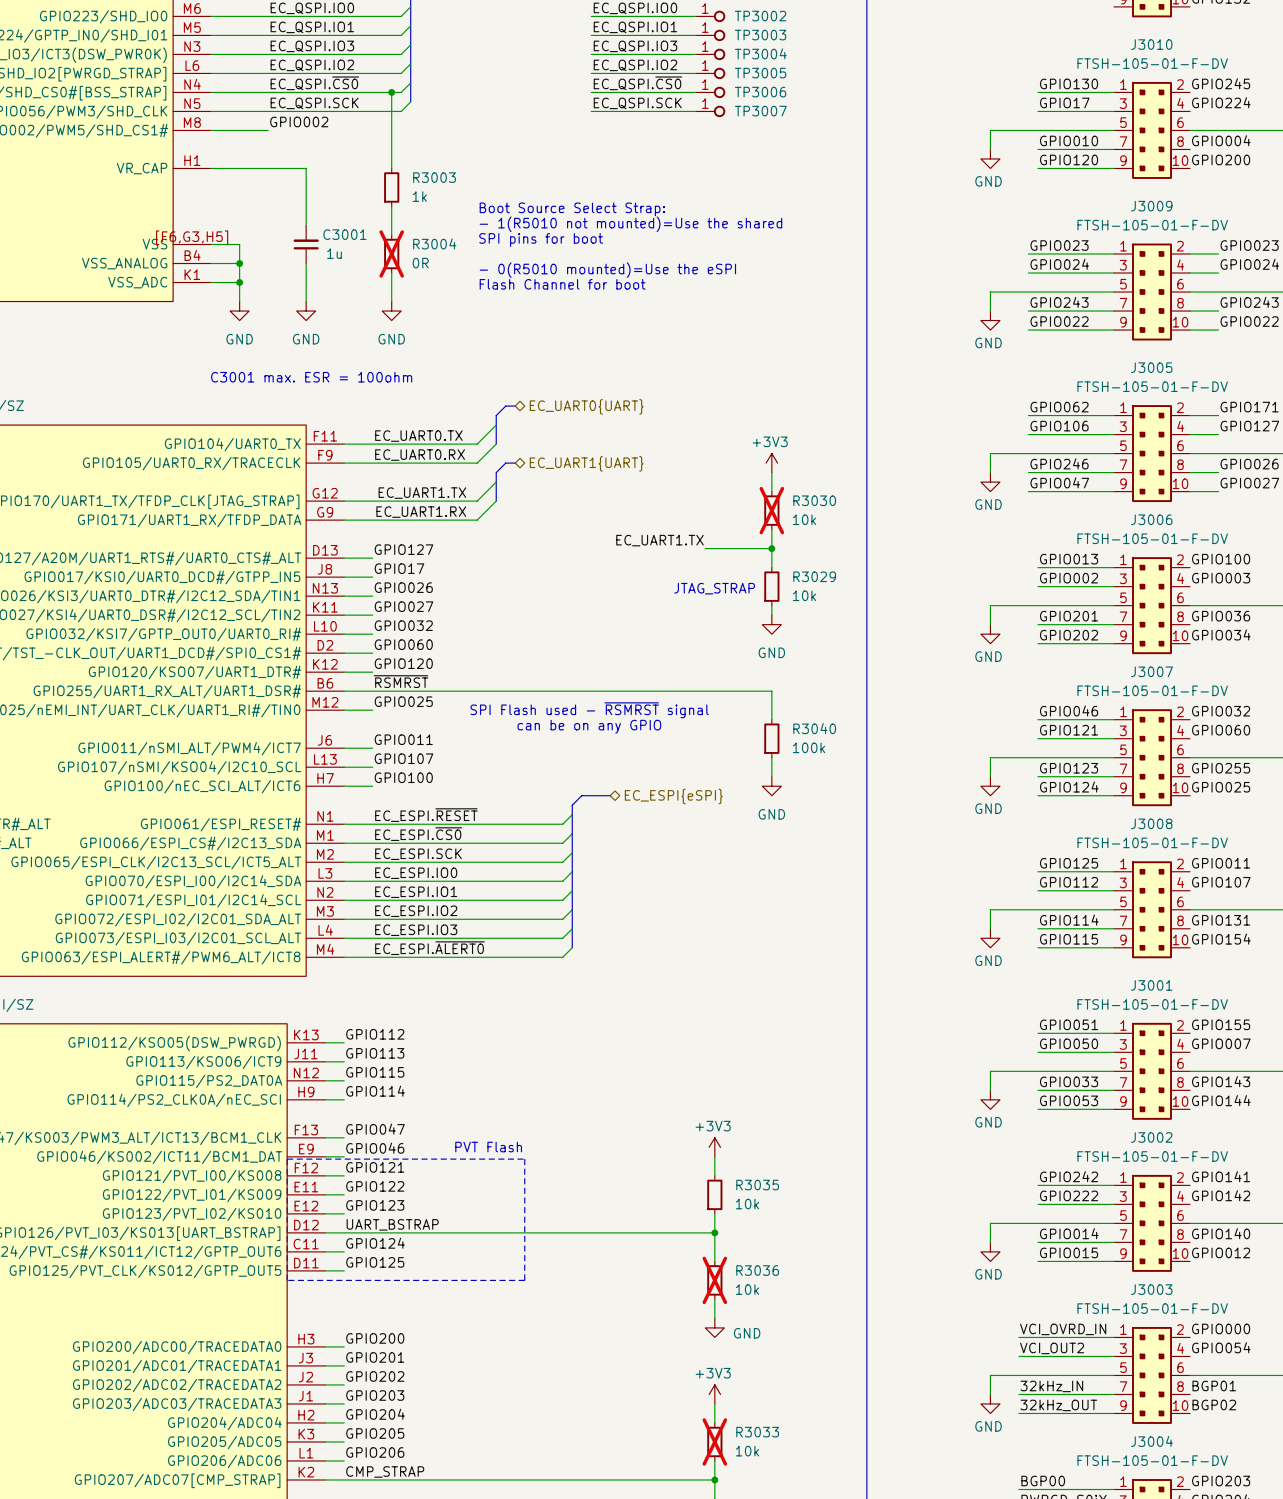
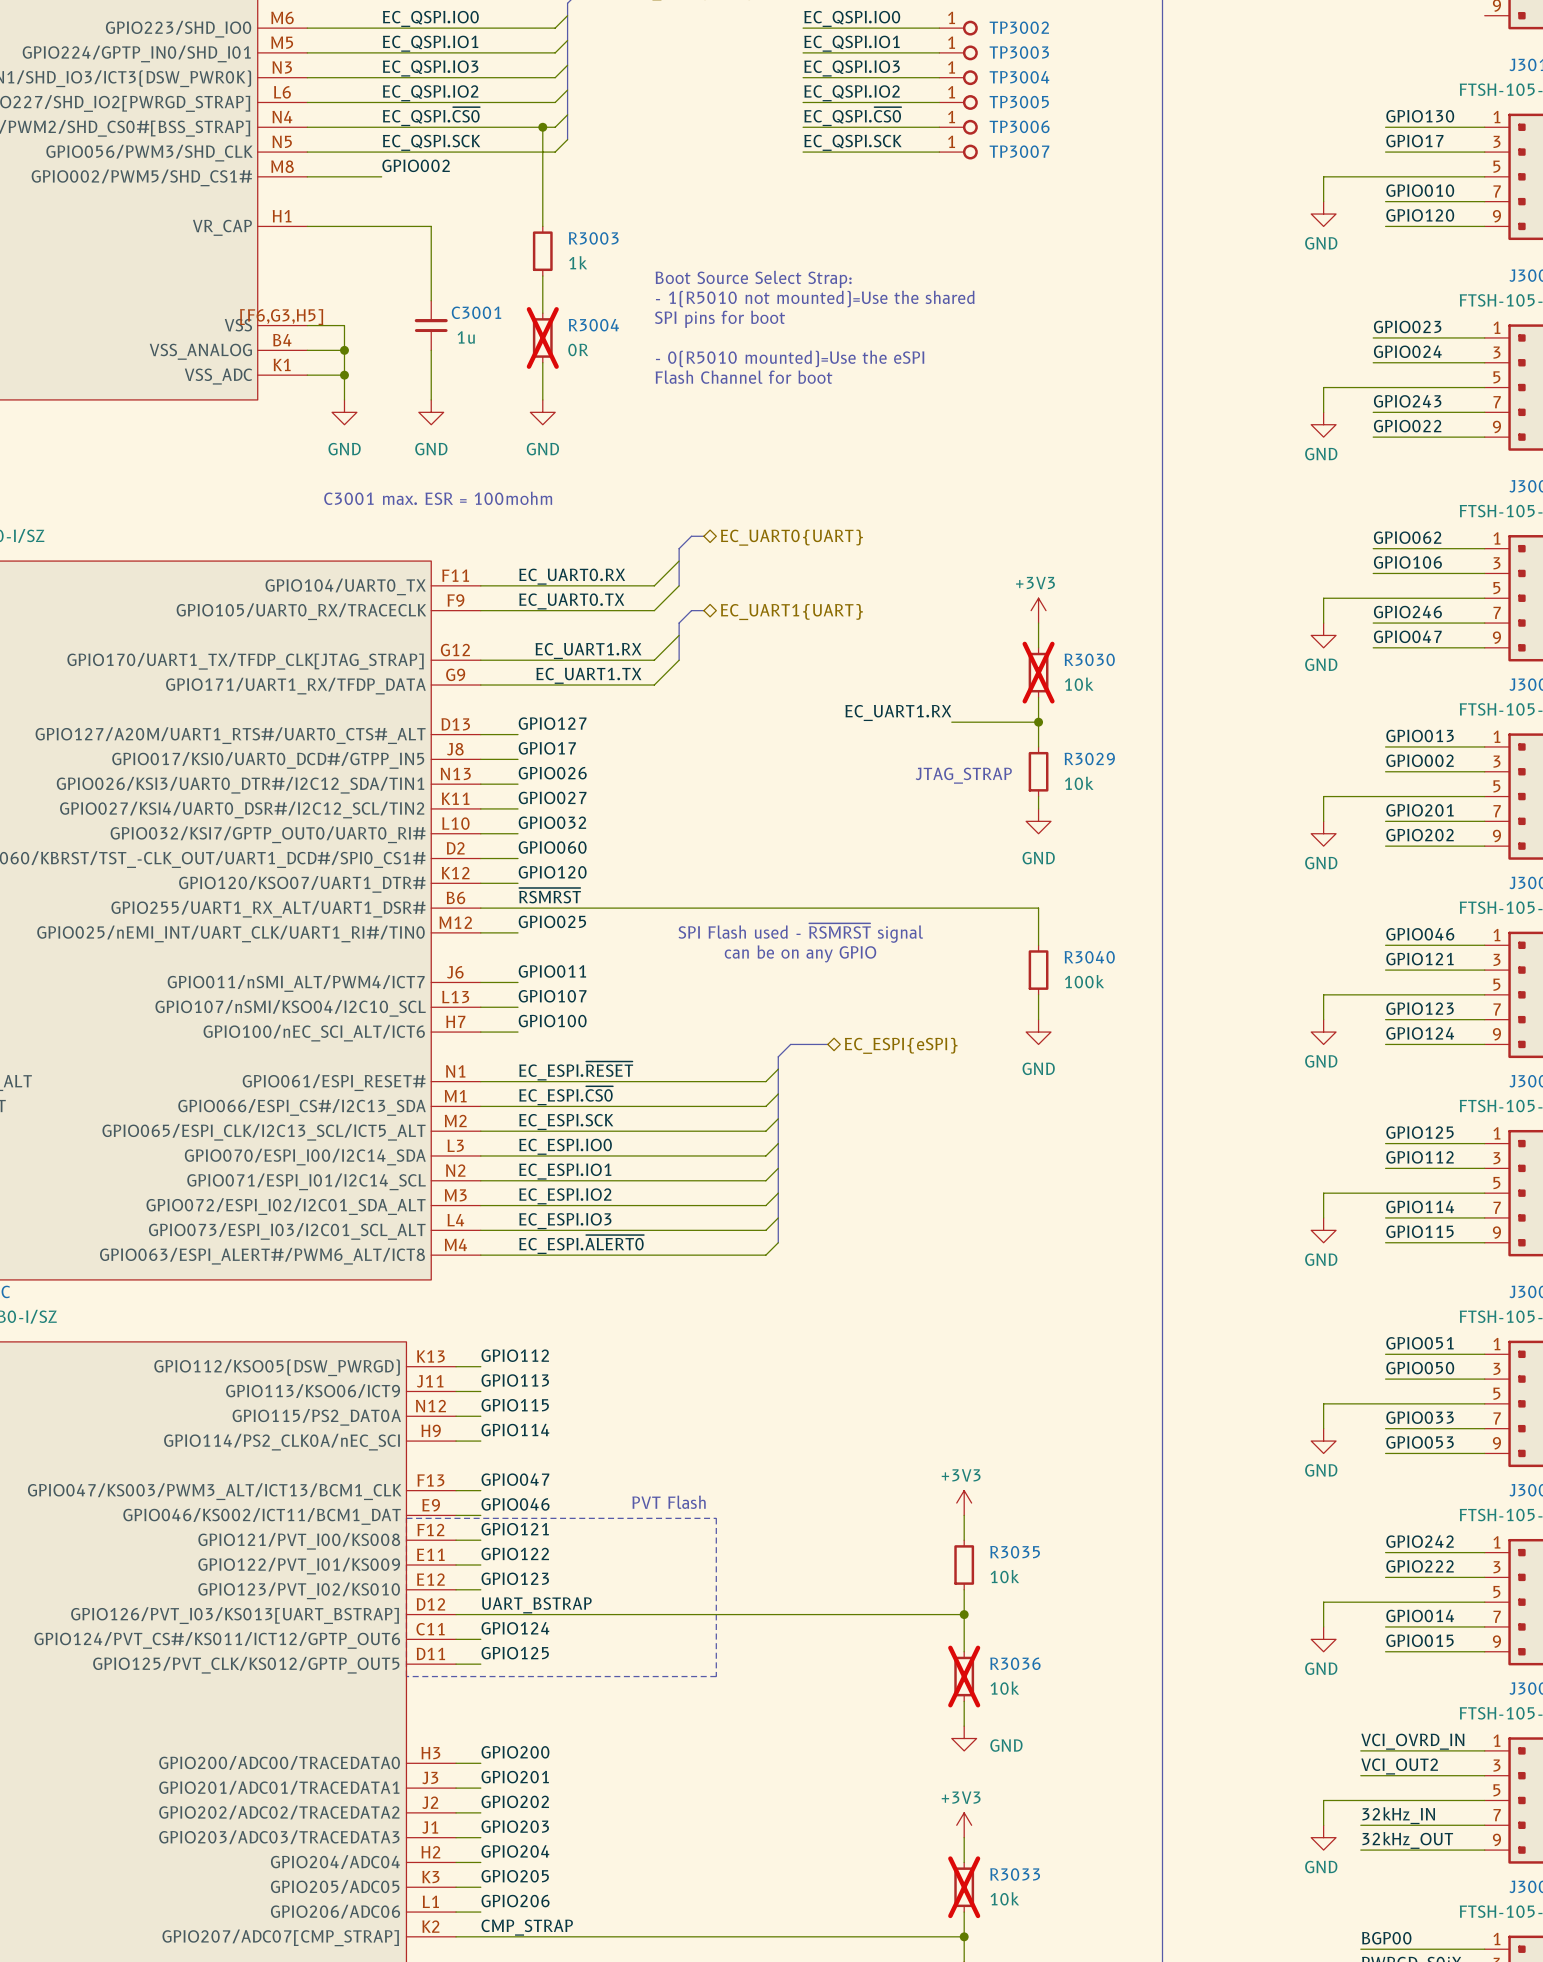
text: C3001 max. ESR = 100ohm (311, 377) -> C3001 max. ESR = 100mohm (438, 498)
label: EC_UART0.TX (418, 436) -> EC_UART0.RX (572, 576)
label: EC_UART0.RX (420, 455) -> EC_UART0.TX (571, 601)
label: EC_UART1.TX (422, 493) -> EC_UART1.RX (588, 651)
label: EC_UART1.RX (421, 512) -> EC_UART1.TX (588, 675)
label: EC_UART1.TX (659, 540) -> EC_UART1.RX (898, 712)

